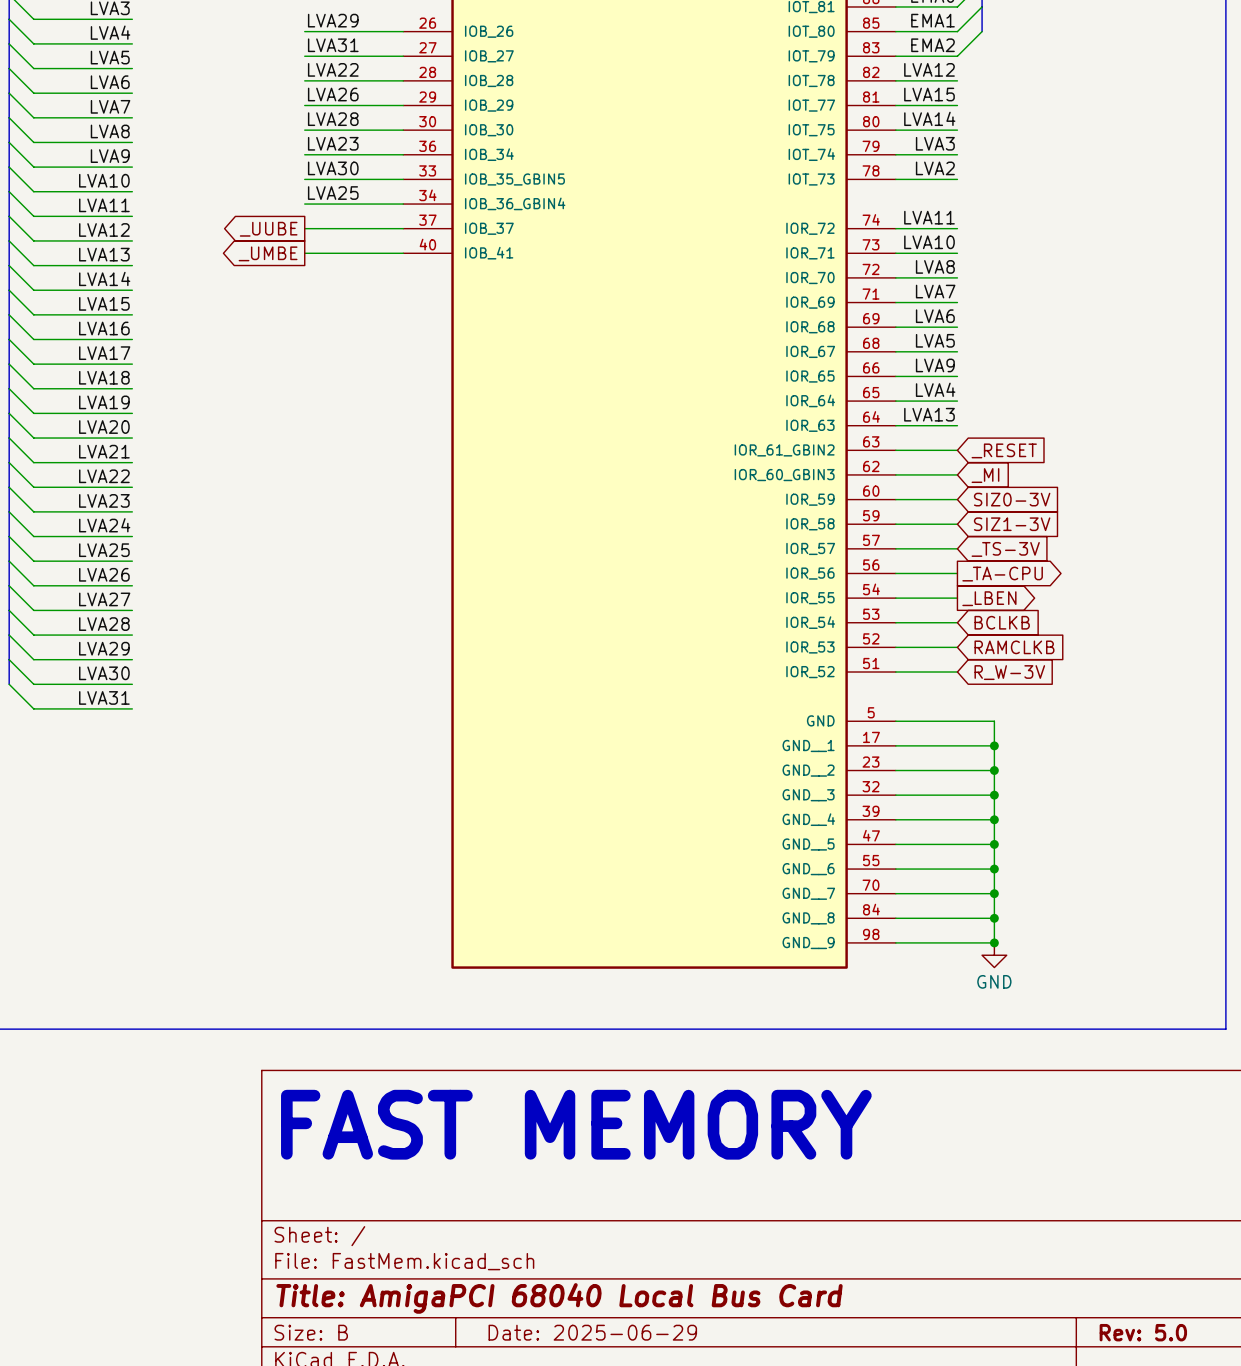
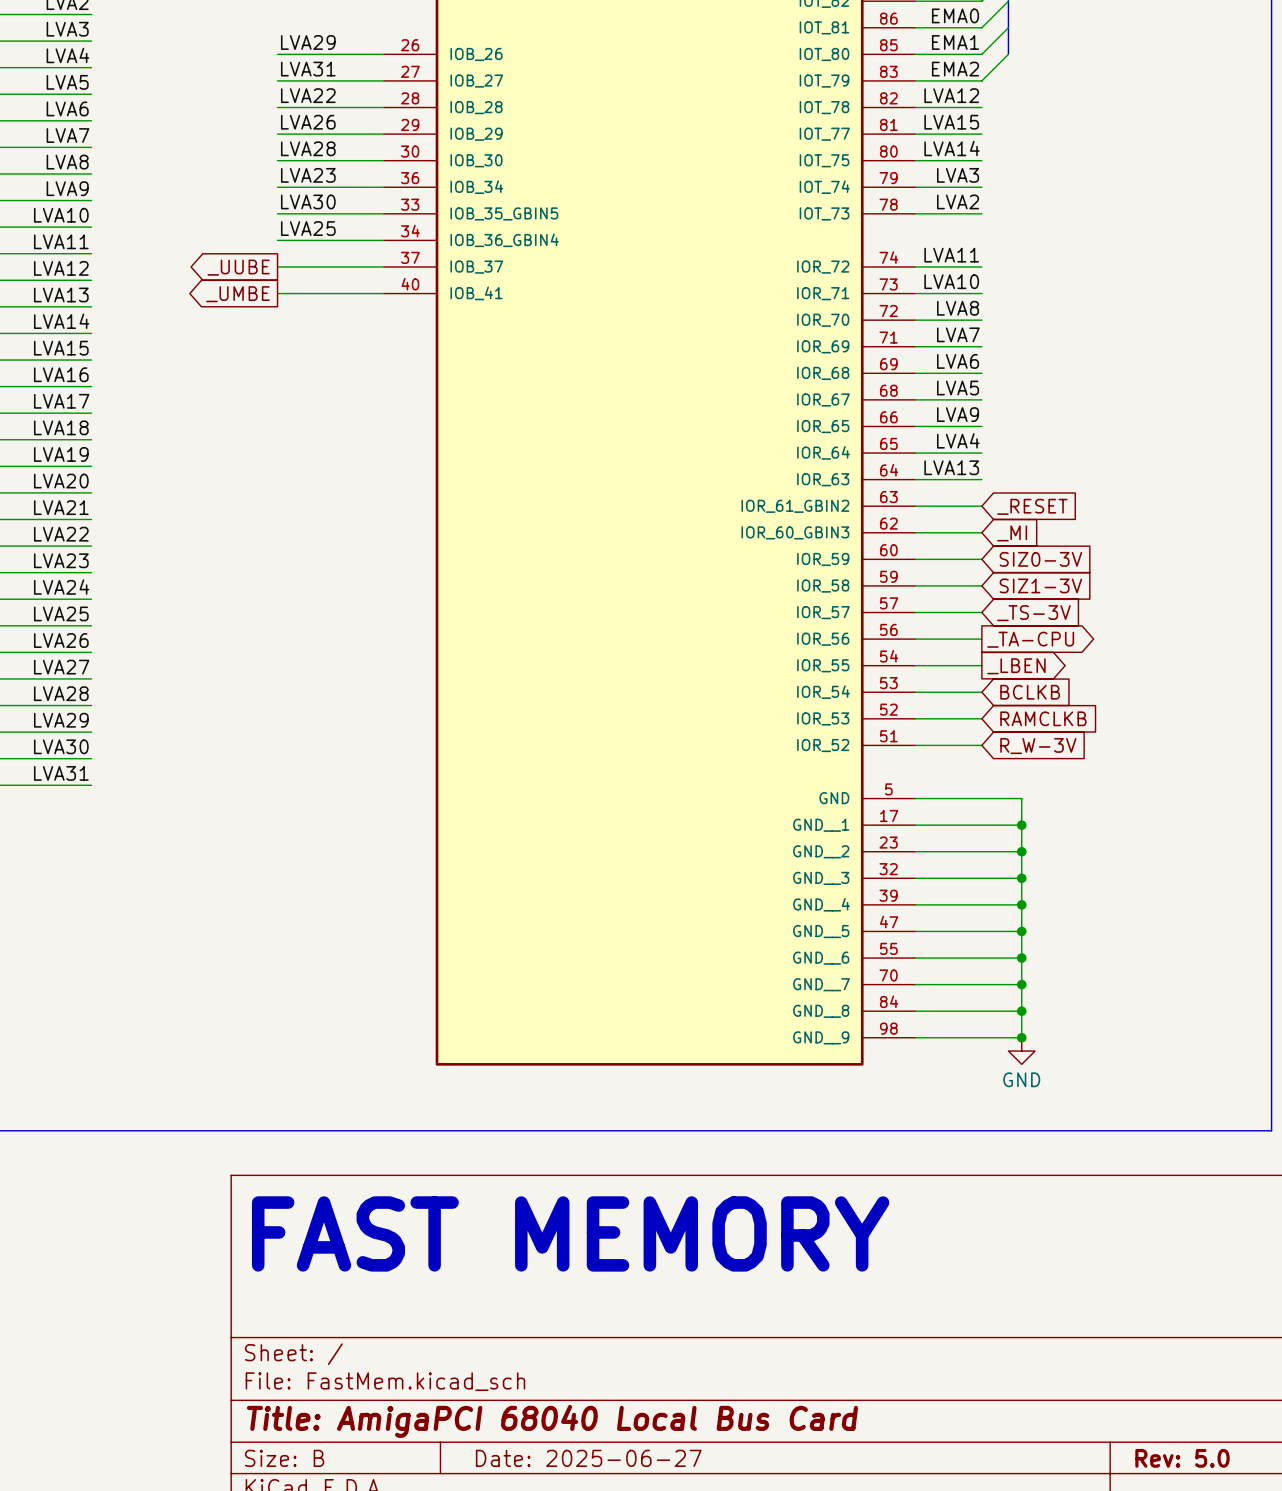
title block: Date: 2025-06-29 (592, 1332) -> Date: 2025-06-27 (588, 1458)

